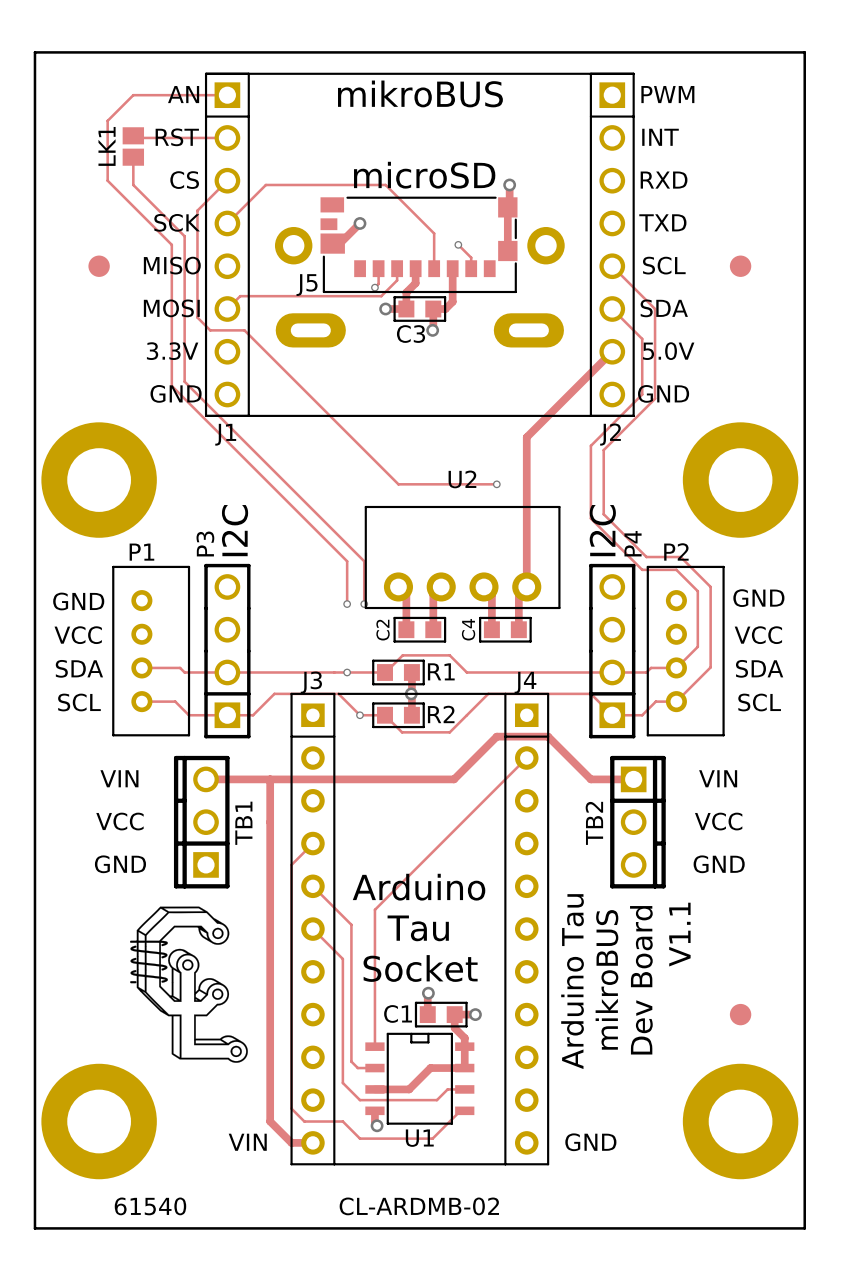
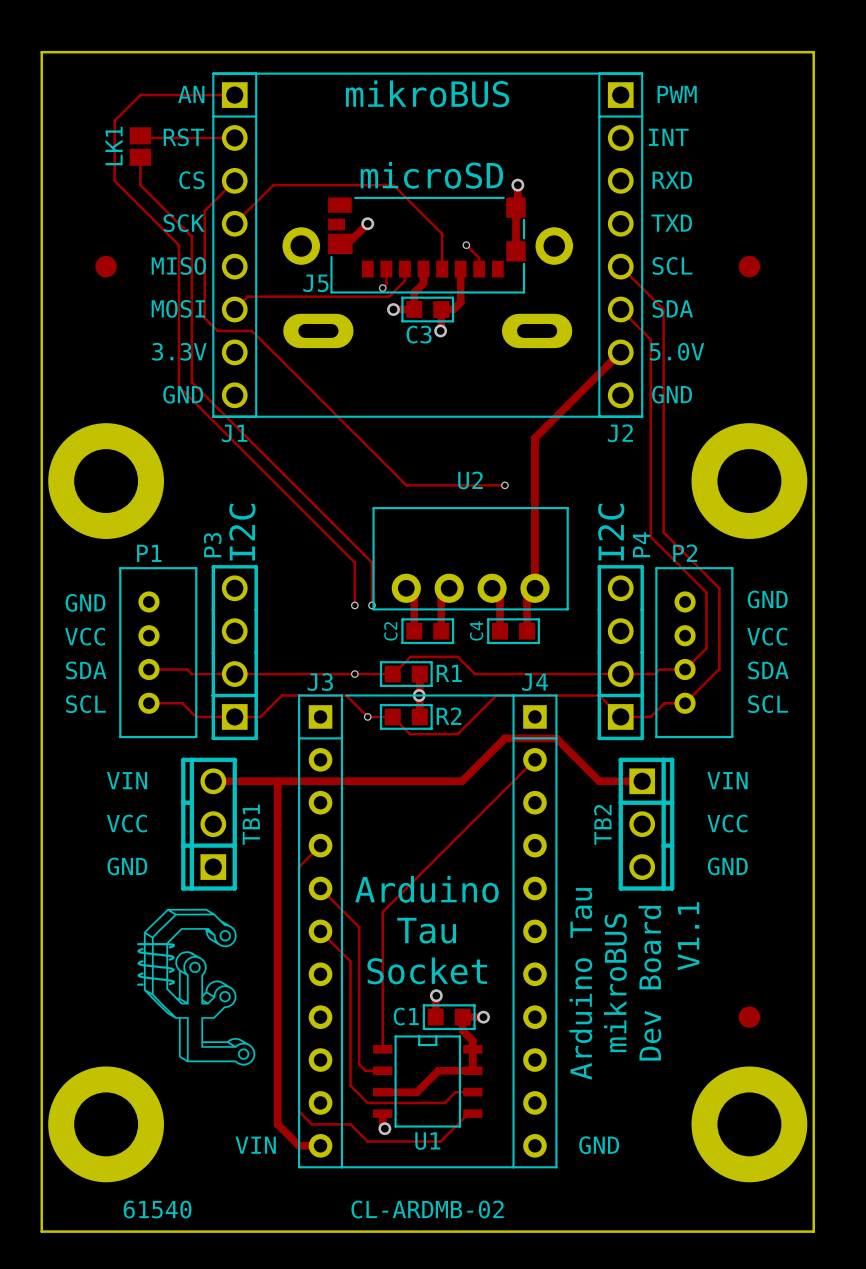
track: (642, 394) (590, 445) (590, 518) (642, 569) (676, 569) -> (650, 395) (650, 536) (685, 571)
track: (655, 398) (603, 450) (603, 514) (646, 557) (680, 557) -> (663, 399) (663, 532) (689, 558)

